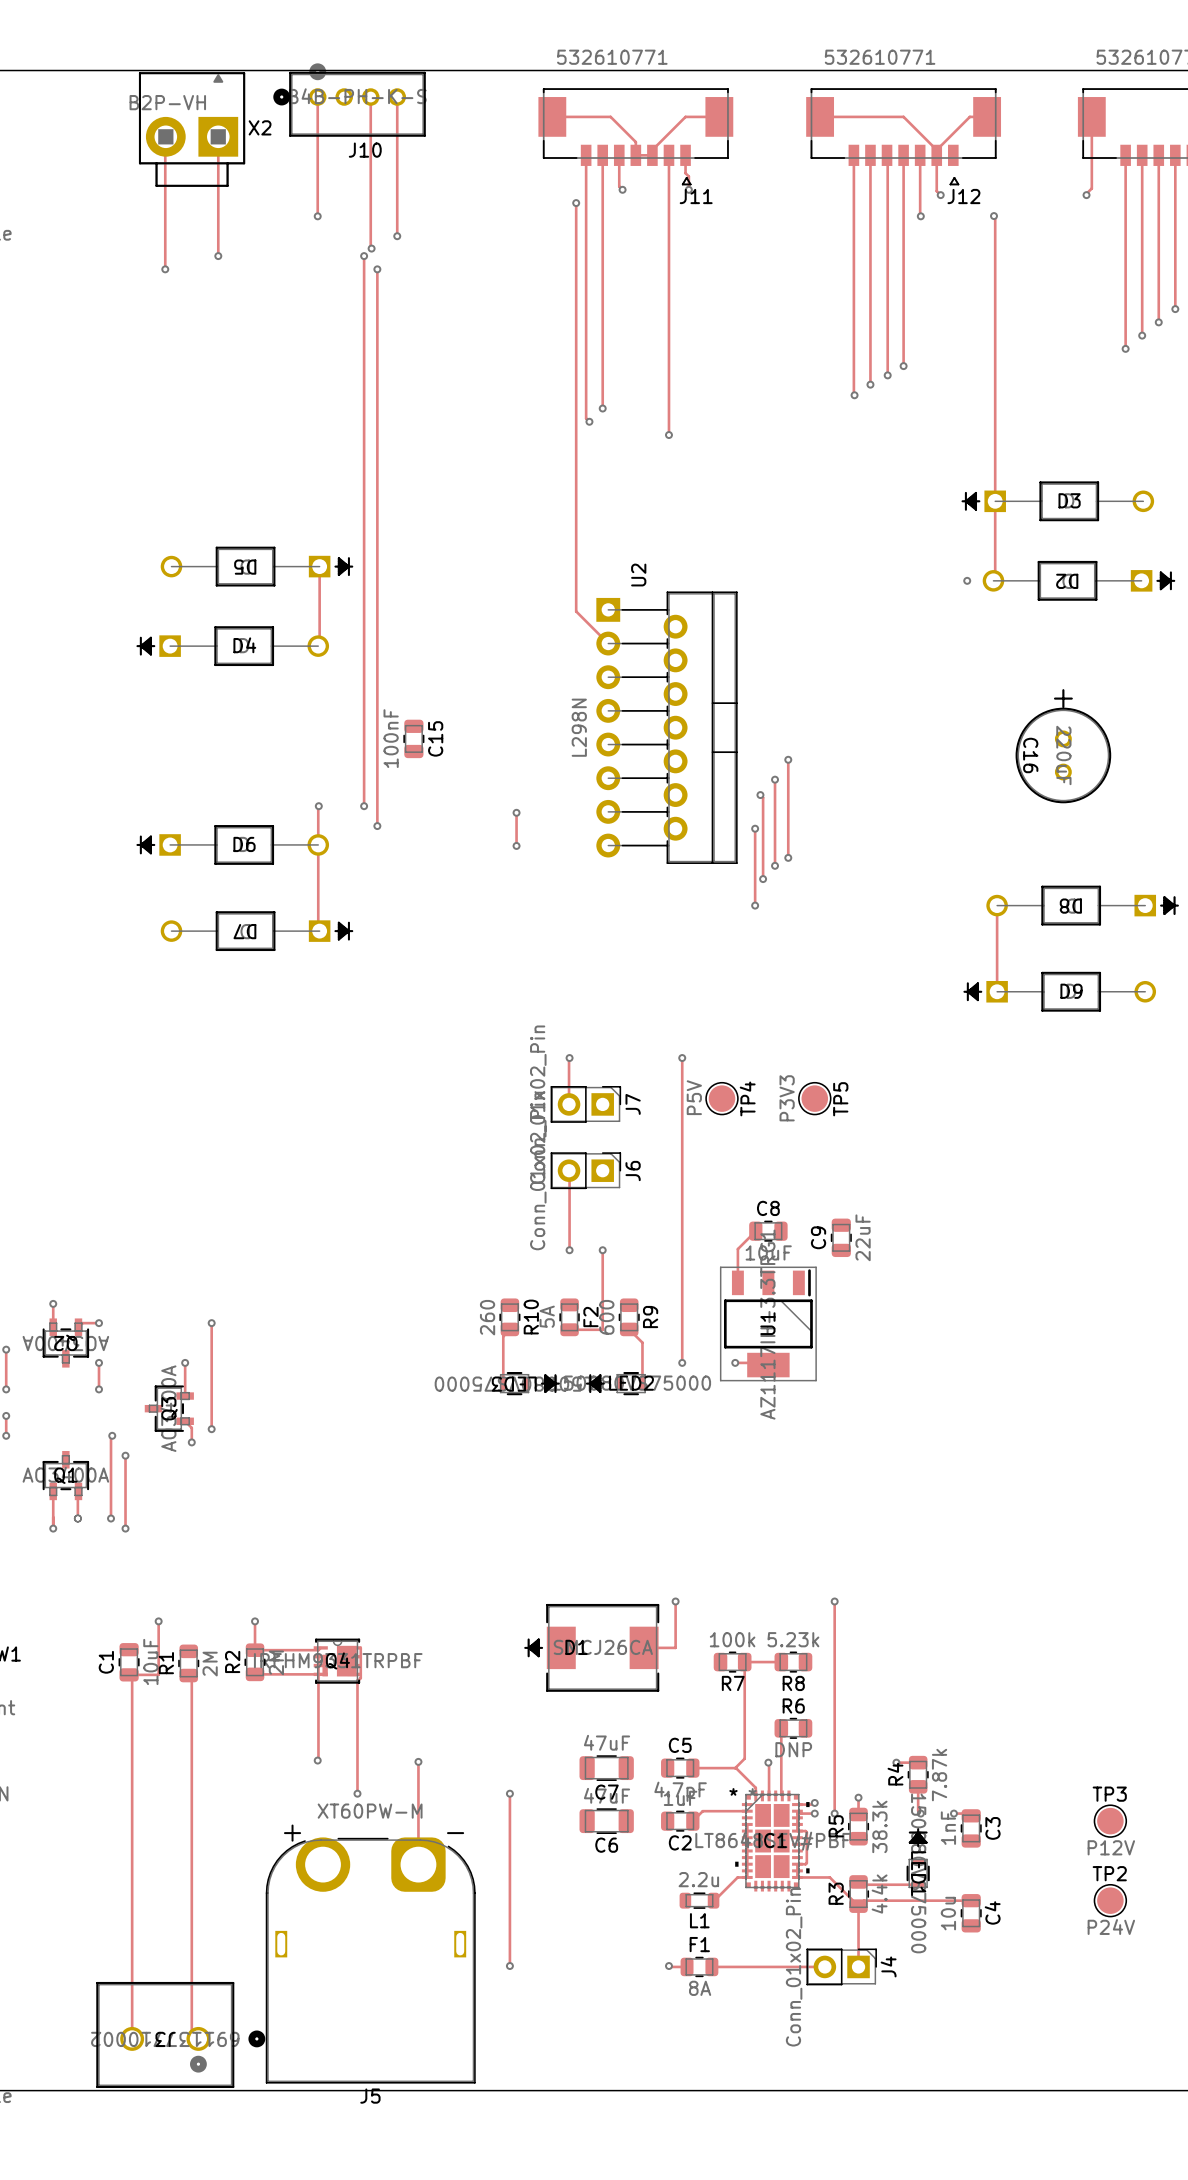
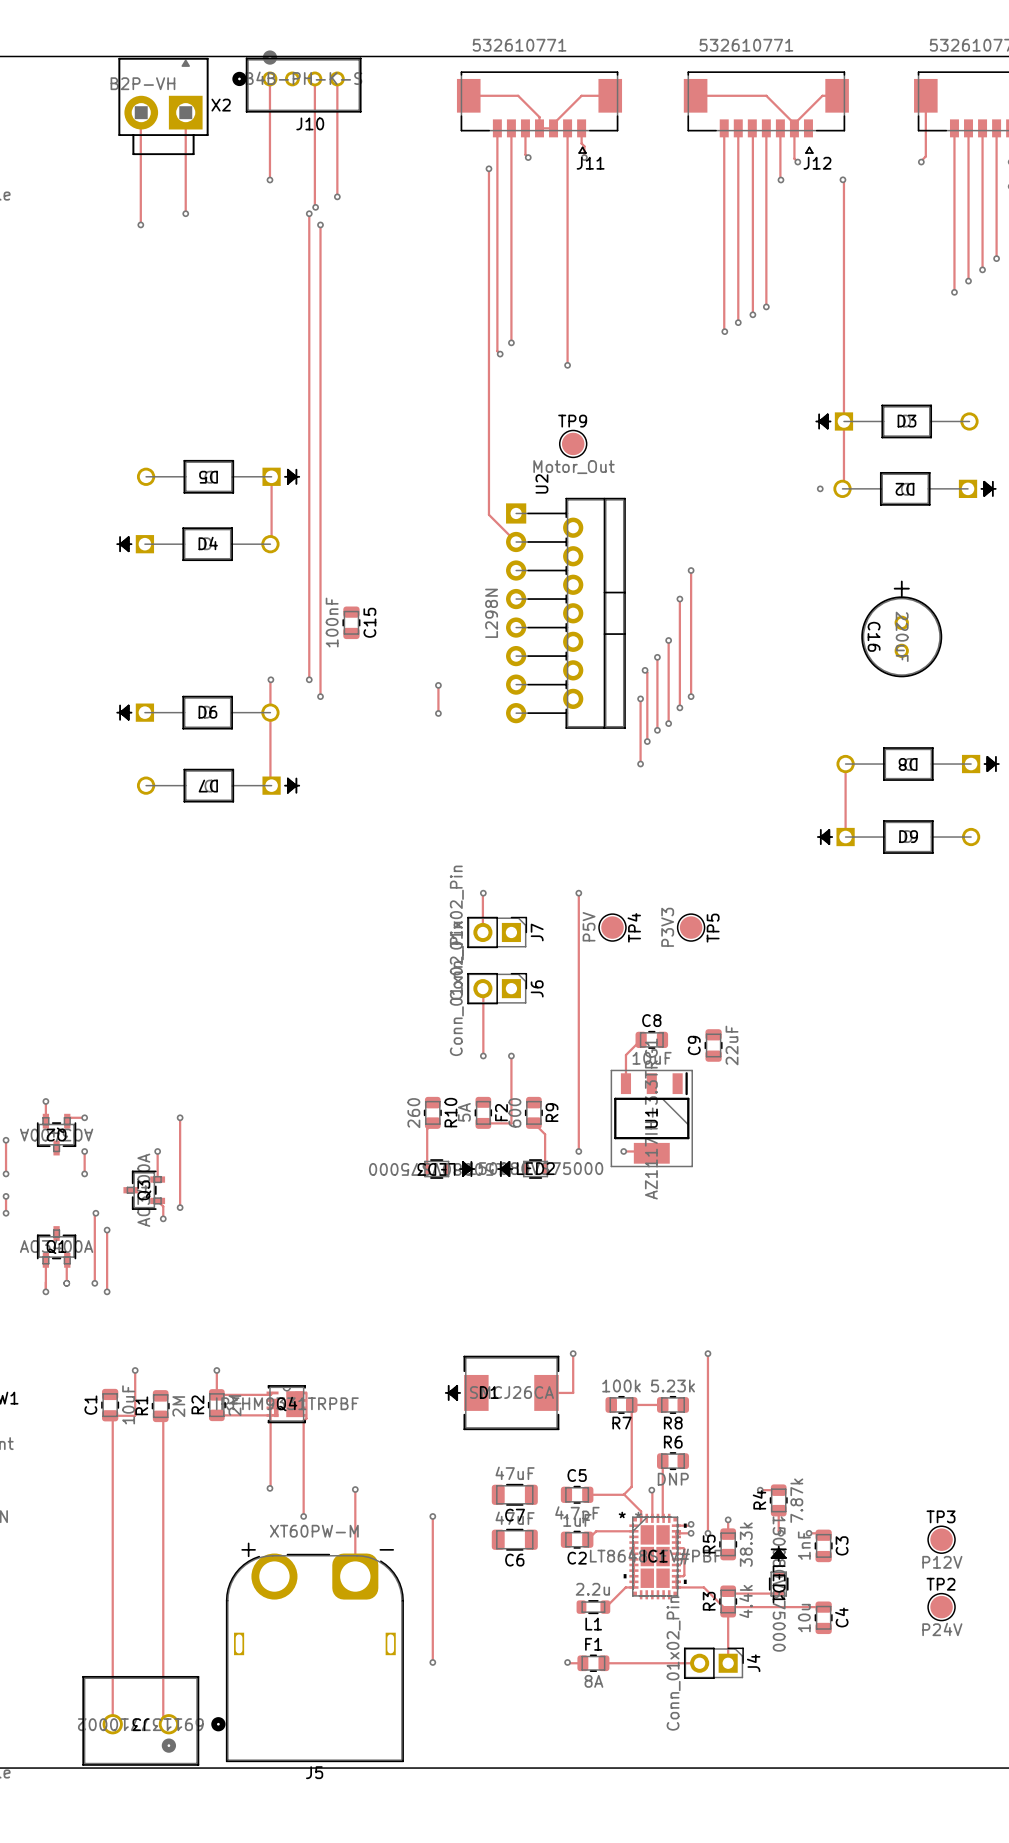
TP9: none -> Motor_Out (573, 443)
track: none -> (691, 570) (691, 696)
via: none -> (691, 570)
track: none -> (679, 599) (679, 707)
via: none -> (679, 599)
via: none -> (691, 696)
via: none -> (679, 707)

